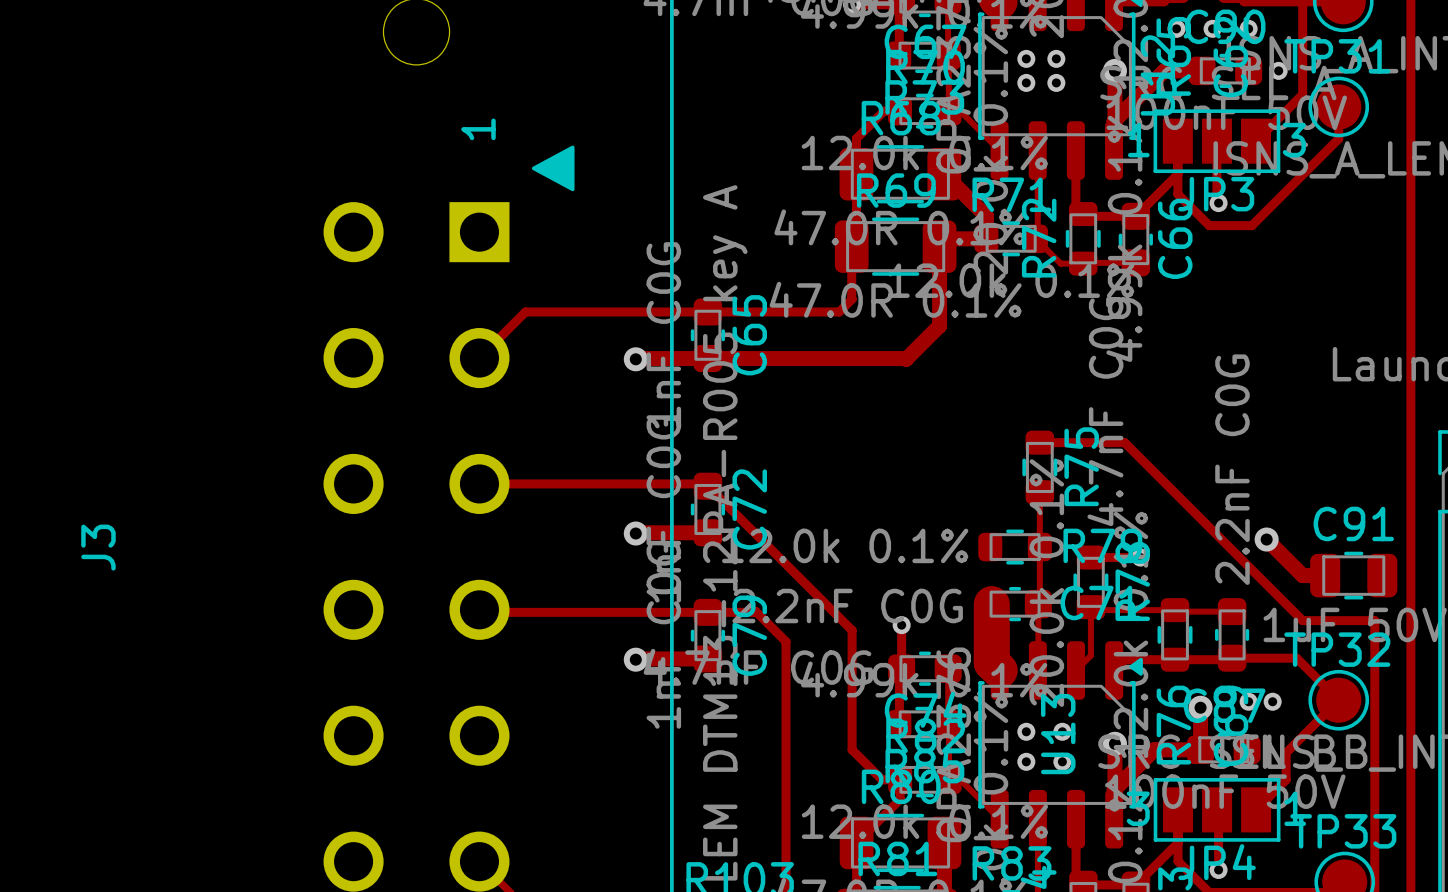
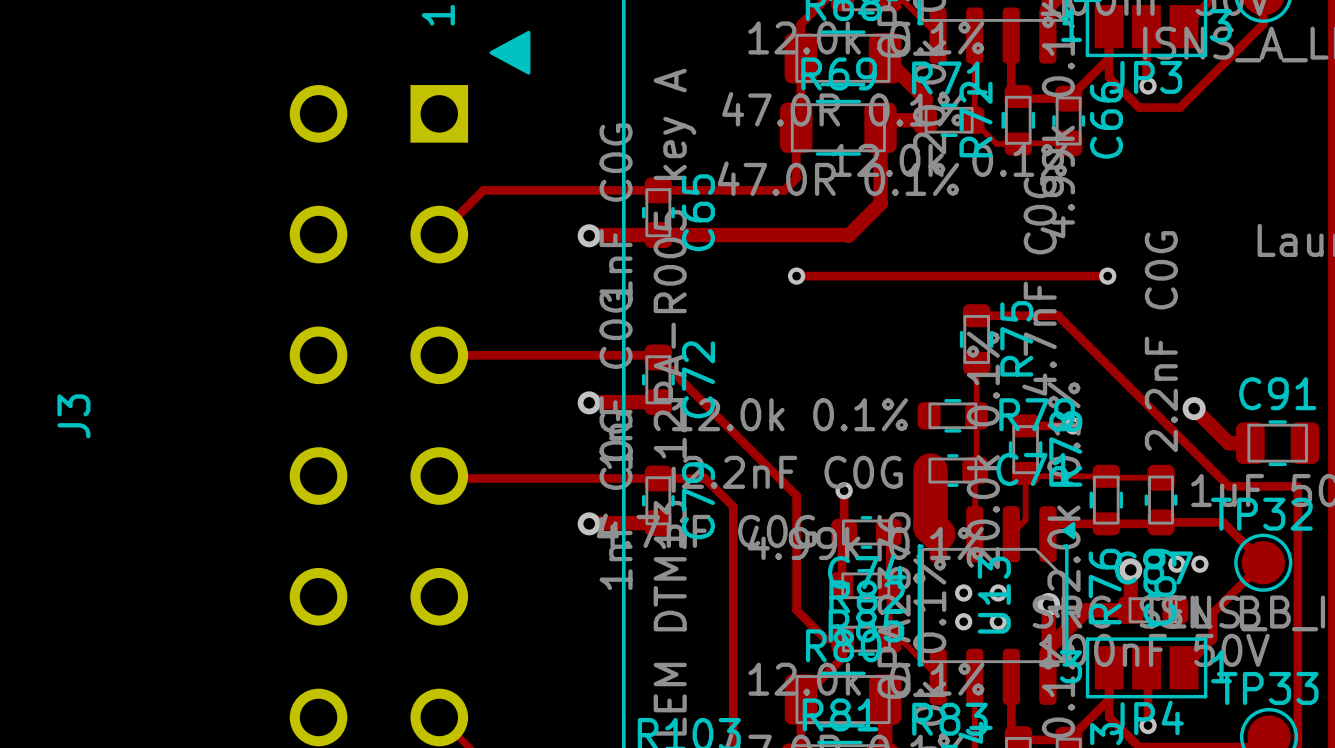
track: none -> (796, 276) (1107, 276)
via: none -> (796, 276)
via: none -> (1107, 276)

